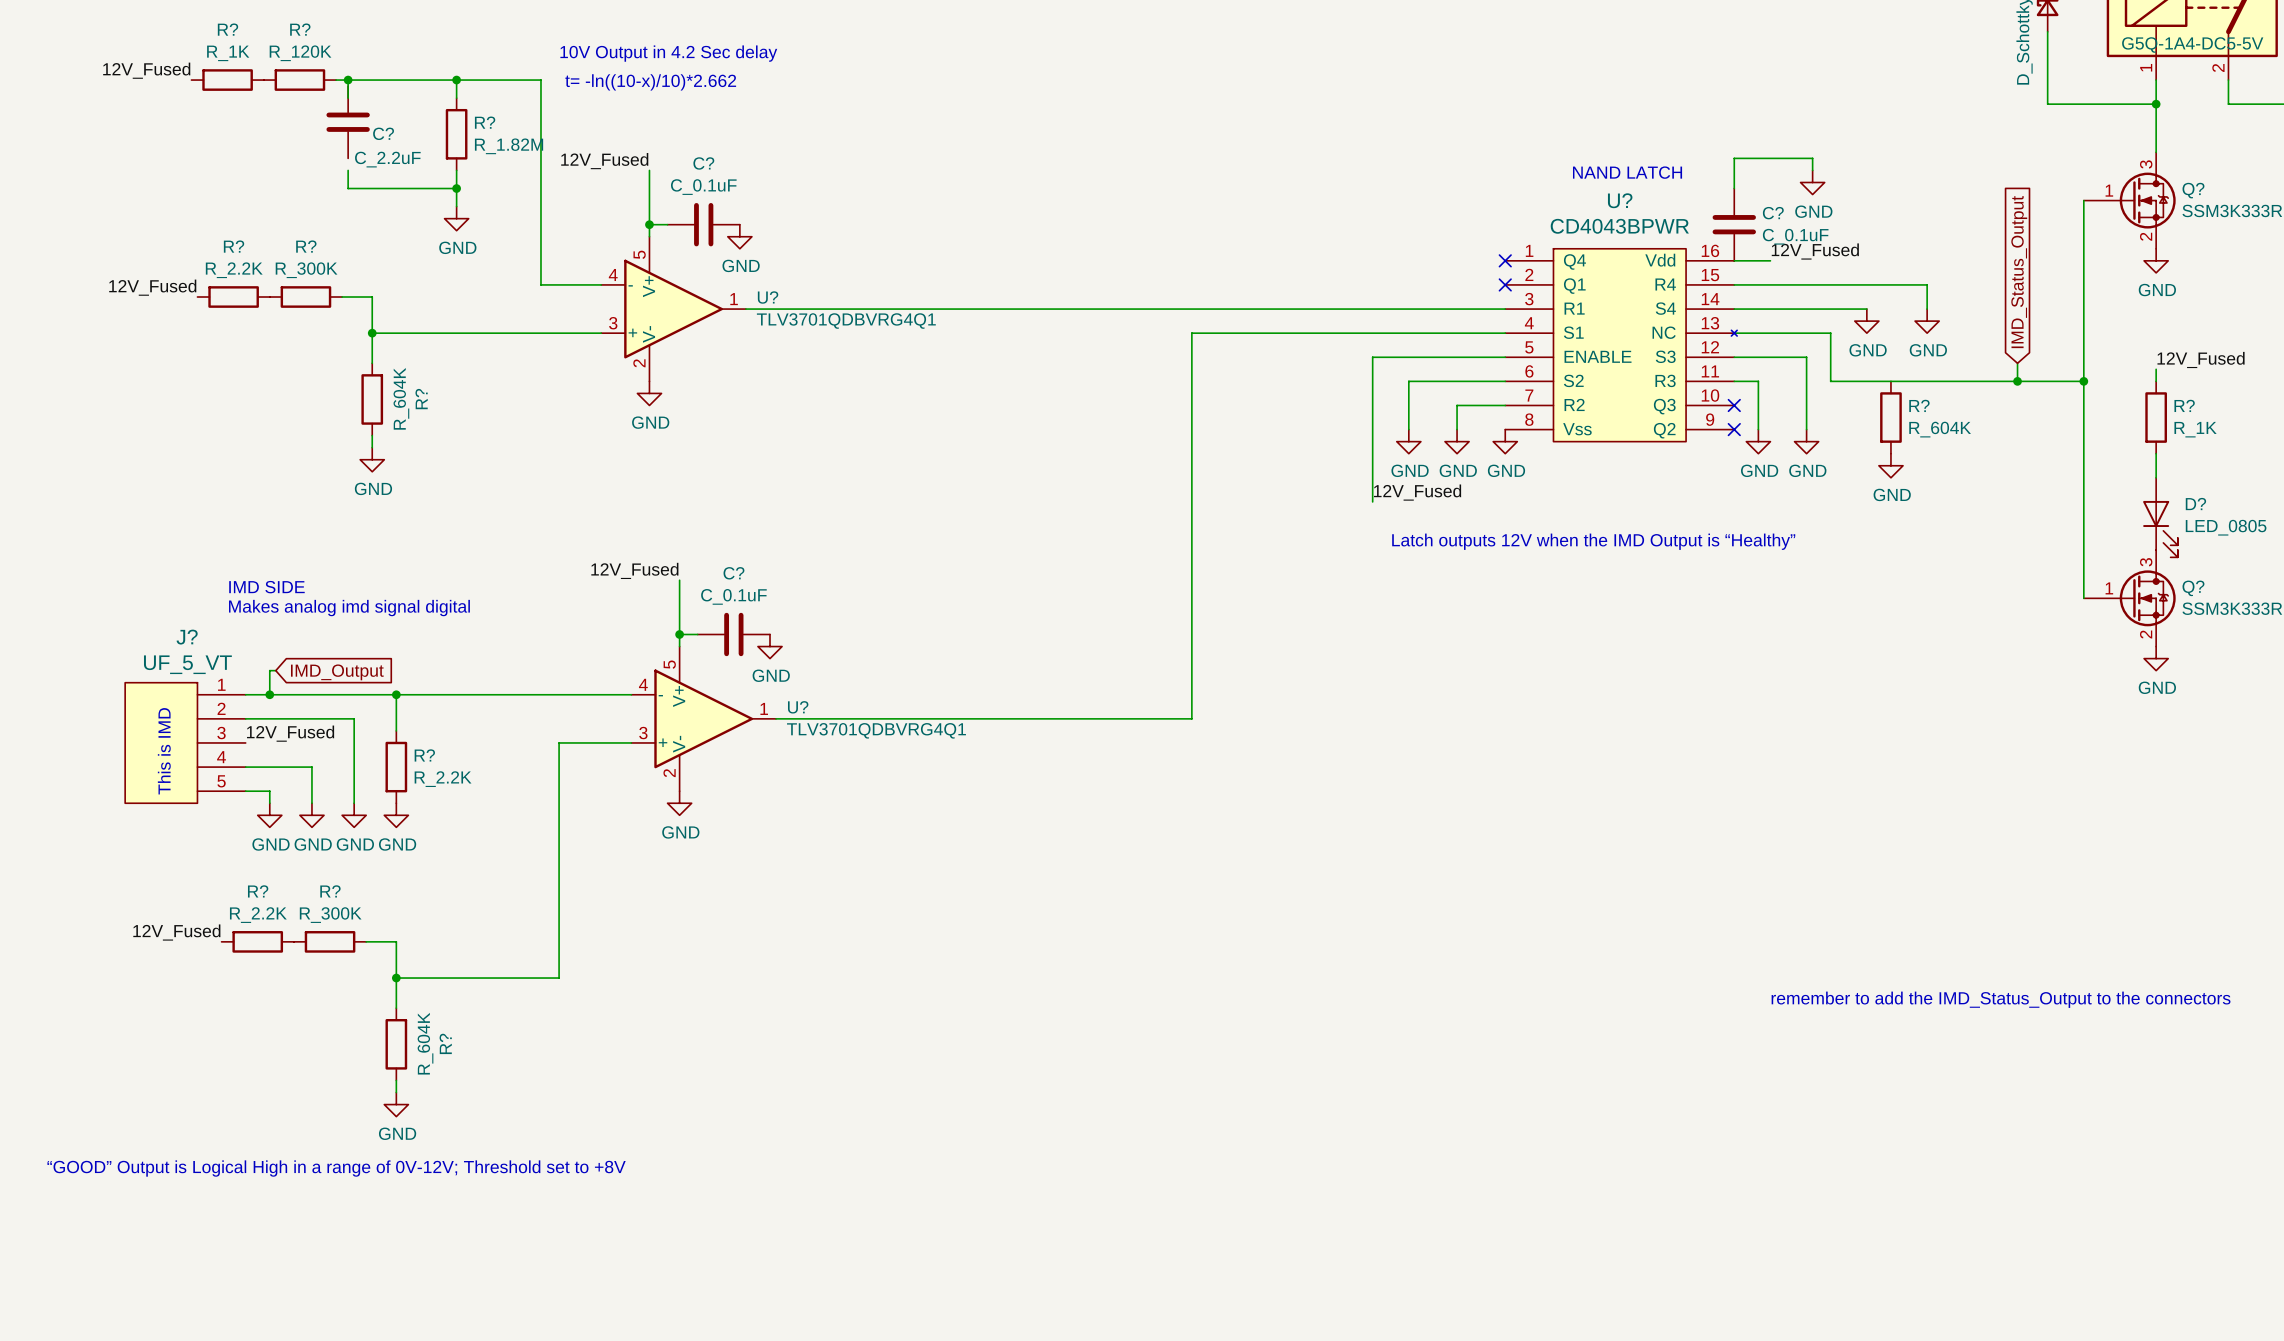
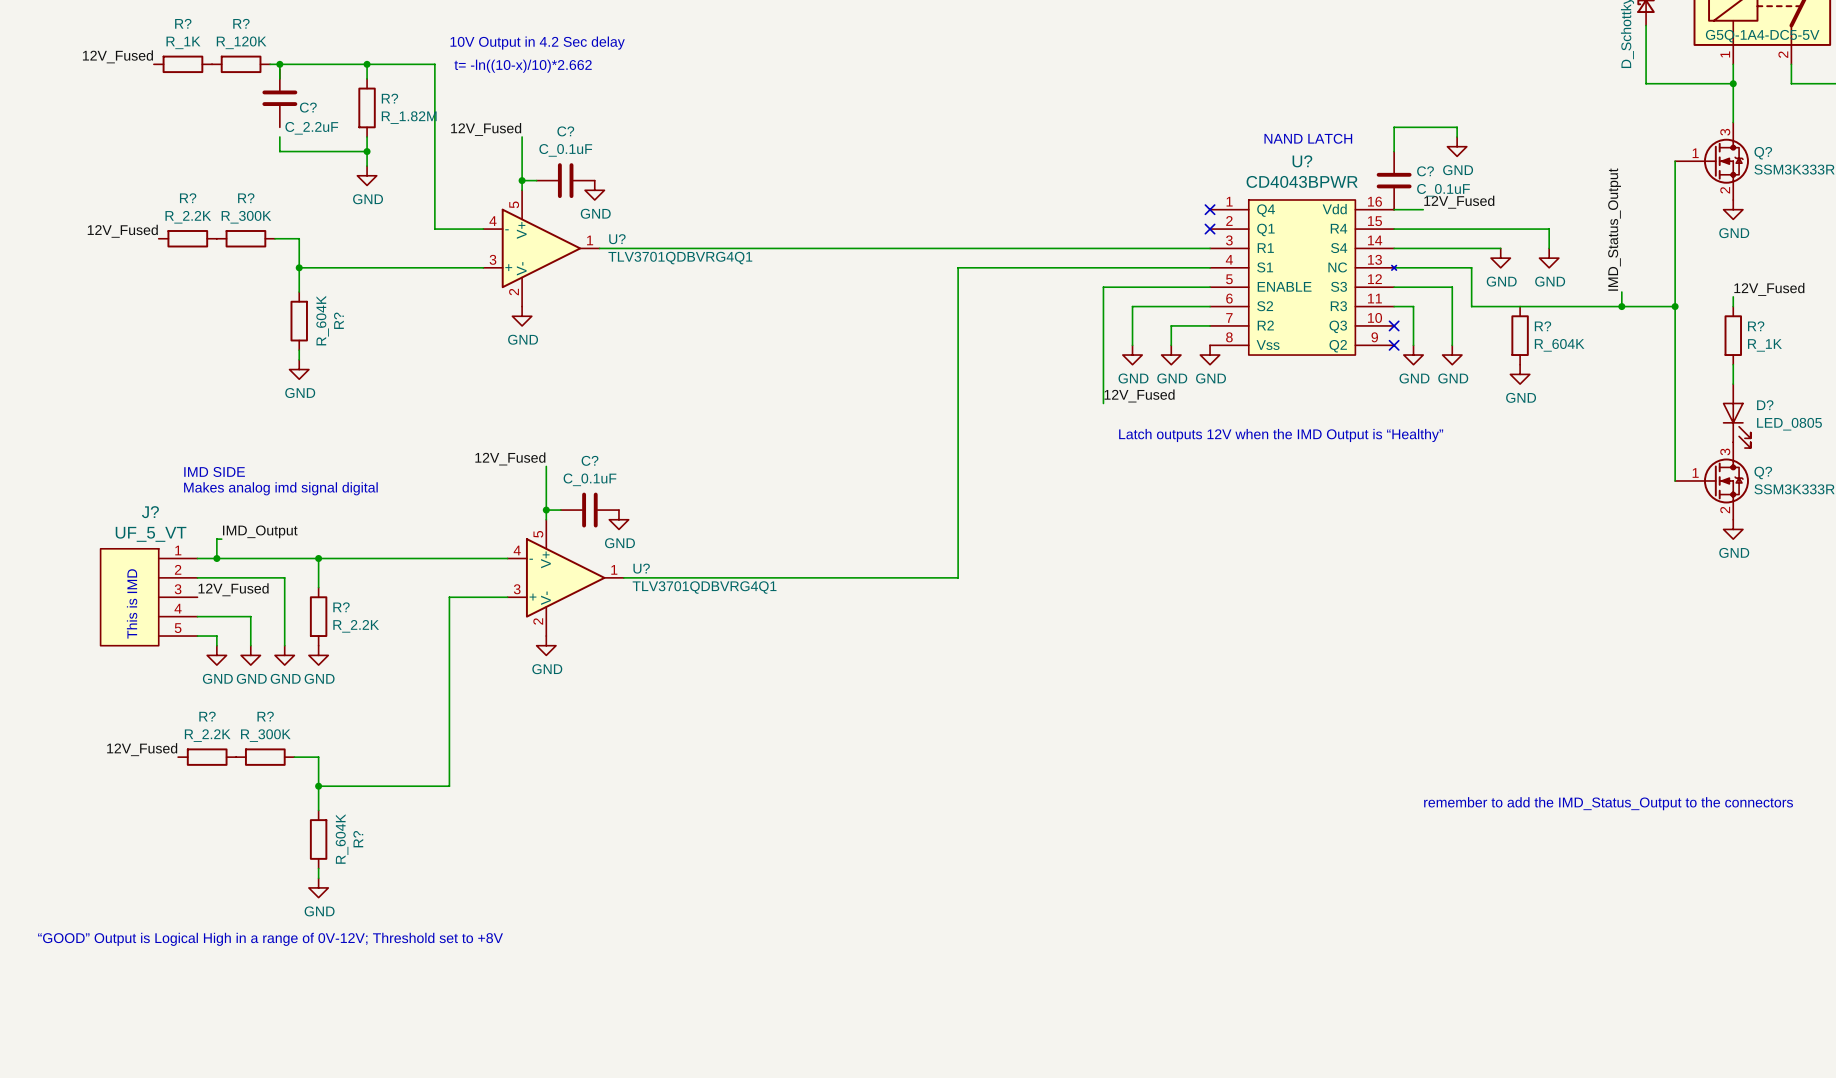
global label: IMD_Status_Output (2019, 272) -> none
label: none -> IMD_Status_Output (1614, 229)
label: none -> IMD_Output (260, 531)
global label: IMD_Output (337, 672) -> none

